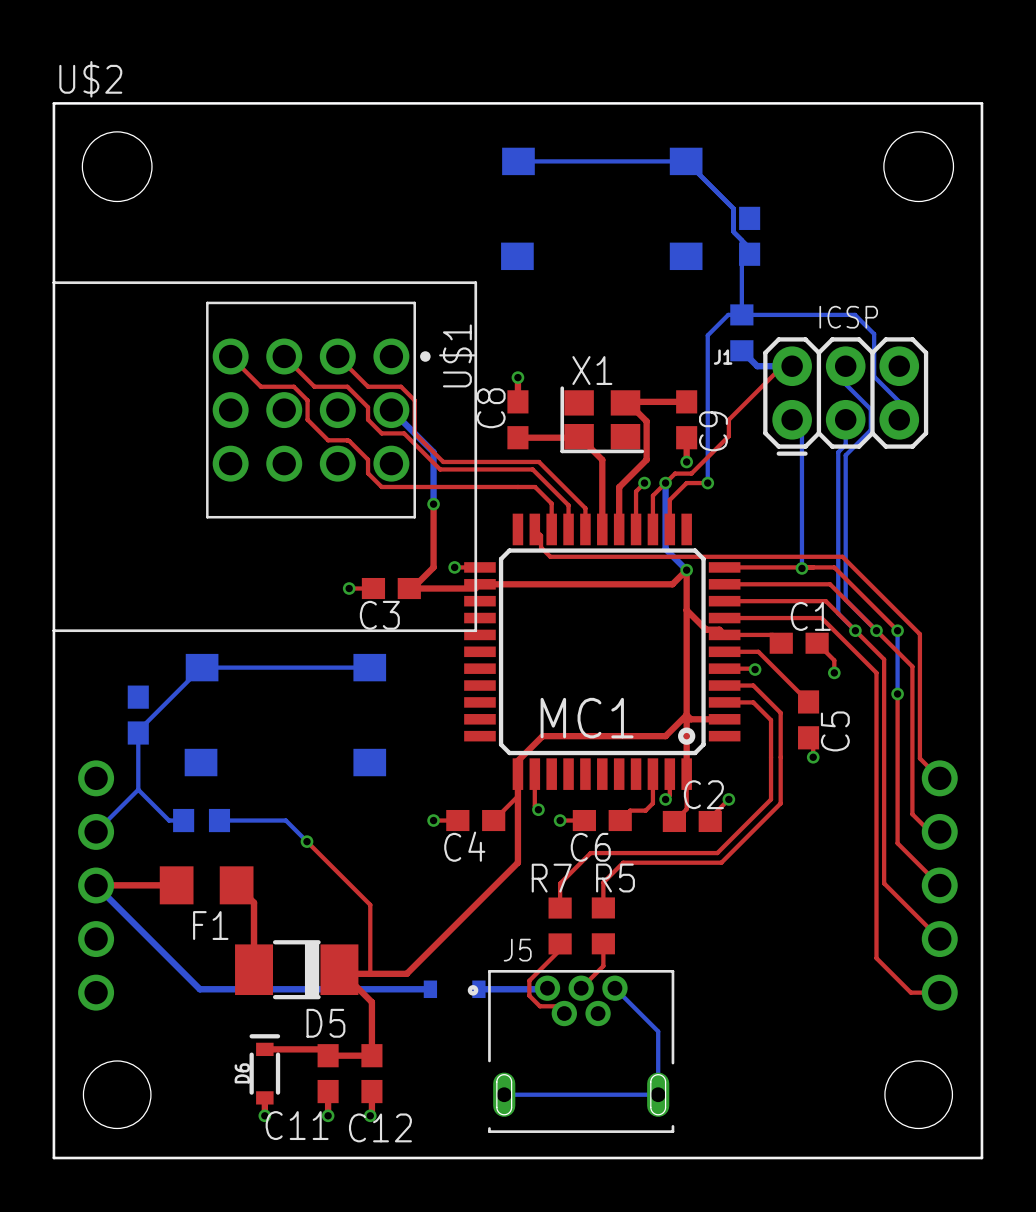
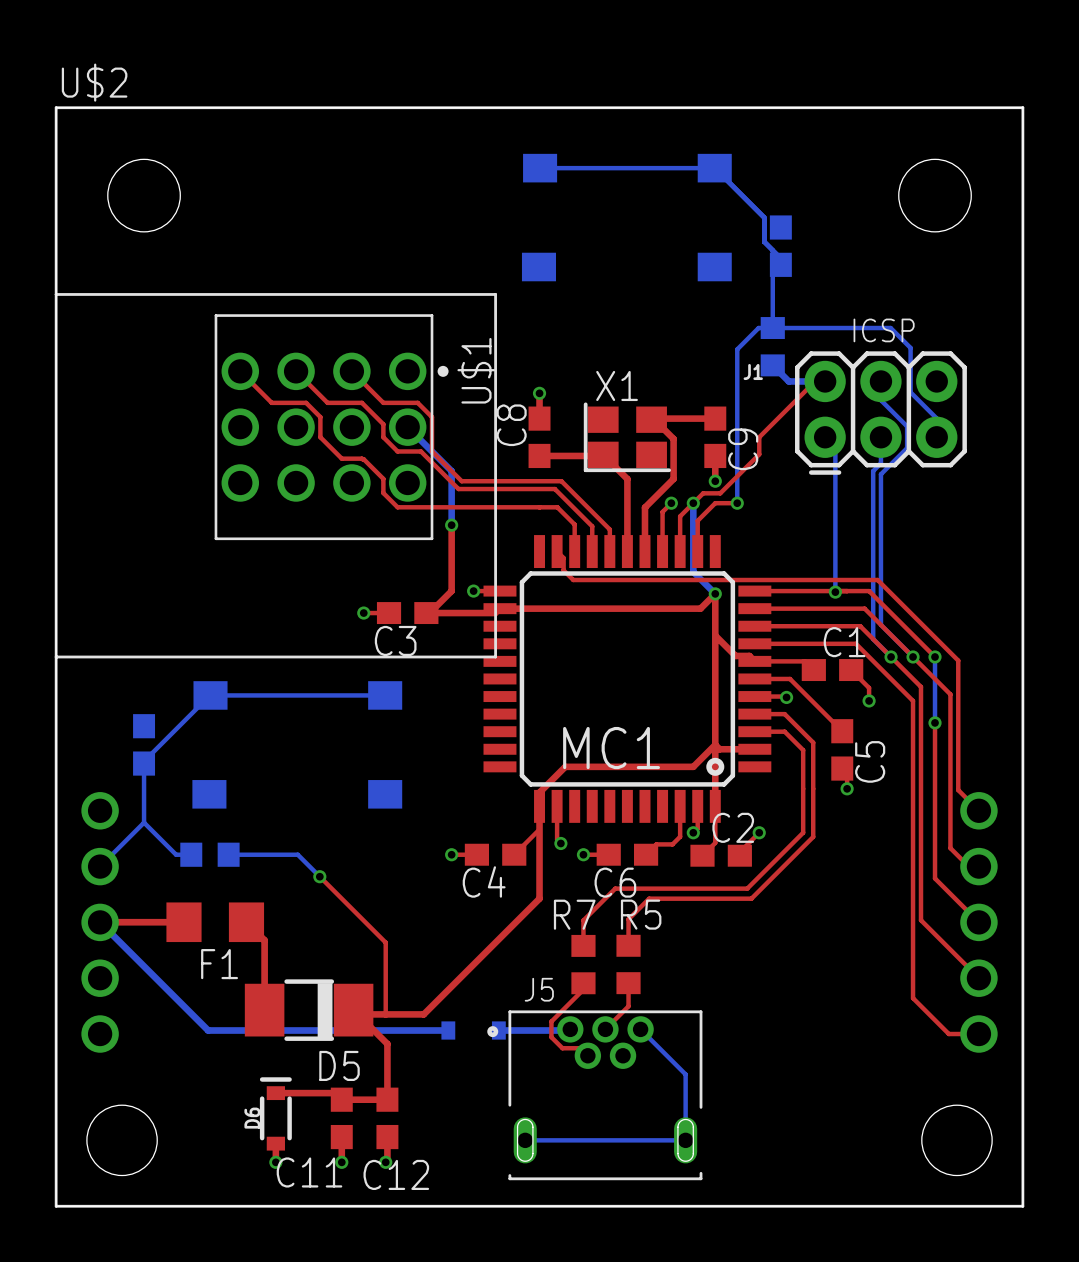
U$2 footprint: [52, 102, 984, 1160] -> [54, 106, 1025, 1208]

